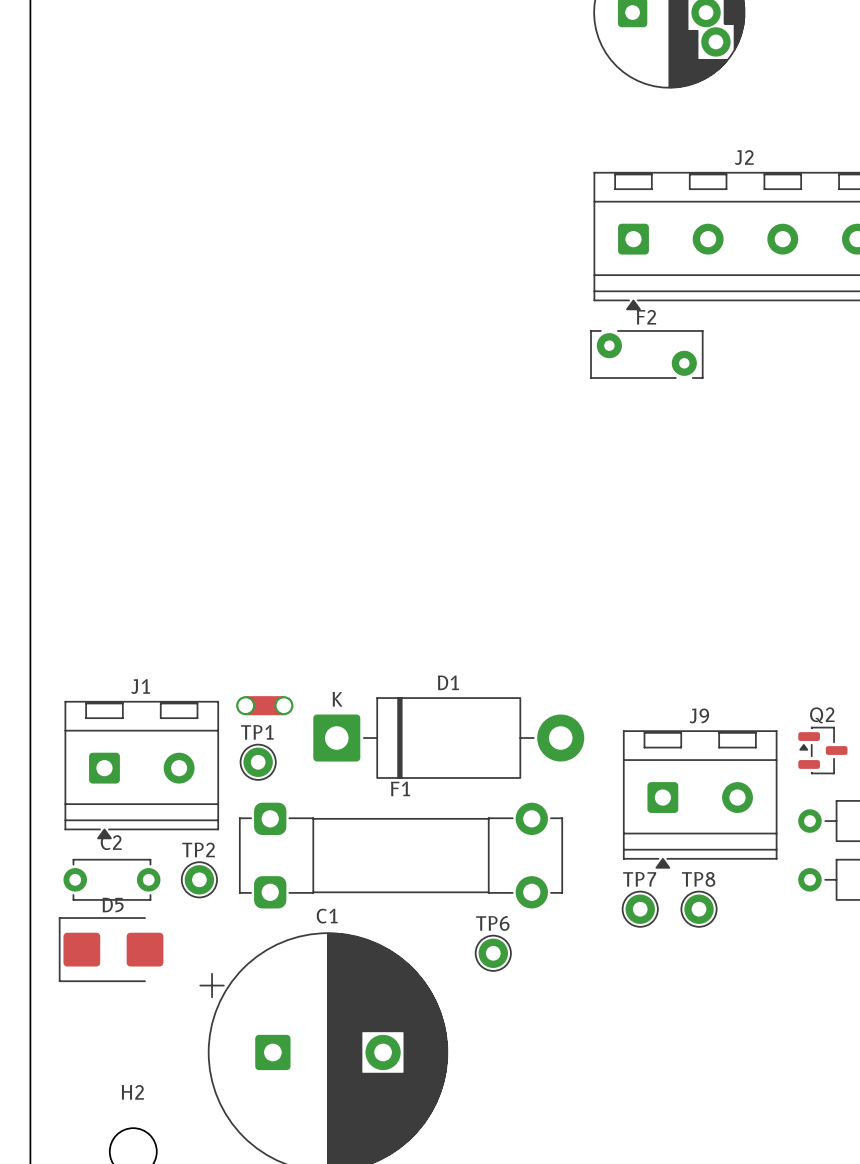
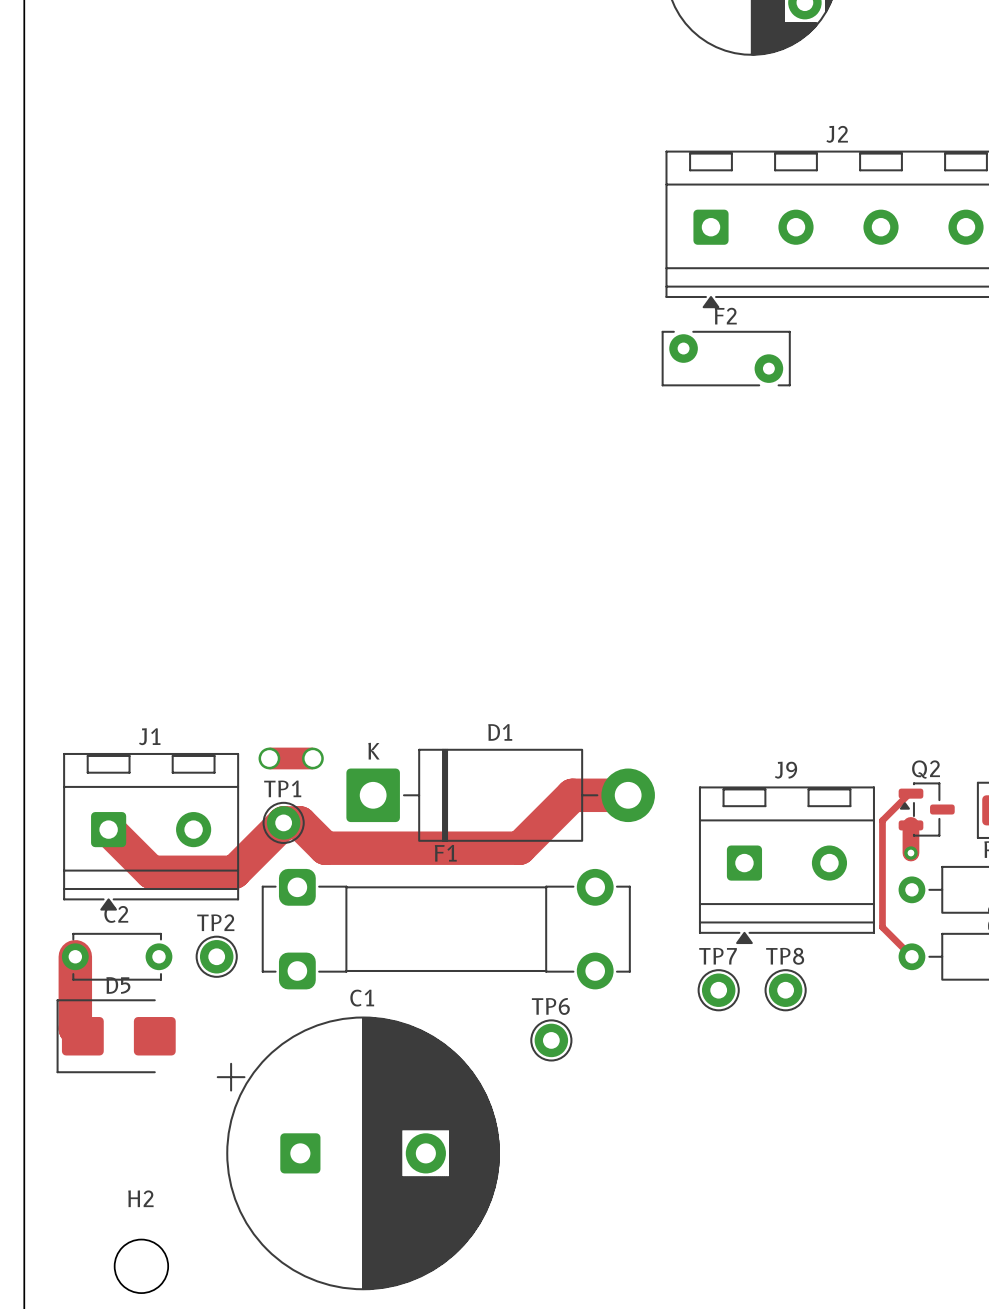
track: none -> (910, 793) (882, 820) (882, 927) (911, 956)
track: none -> (628, 795) (572, 795) (519, 848) (325, 848) (299, 822) (283, 822) (234, 872) (151, 872) (108, 829)
track: none -> (910, 825) (910, 853)
via: none -> (910, 853)
track: none -> (75, 956) (75, 1028) (82, 1036)

